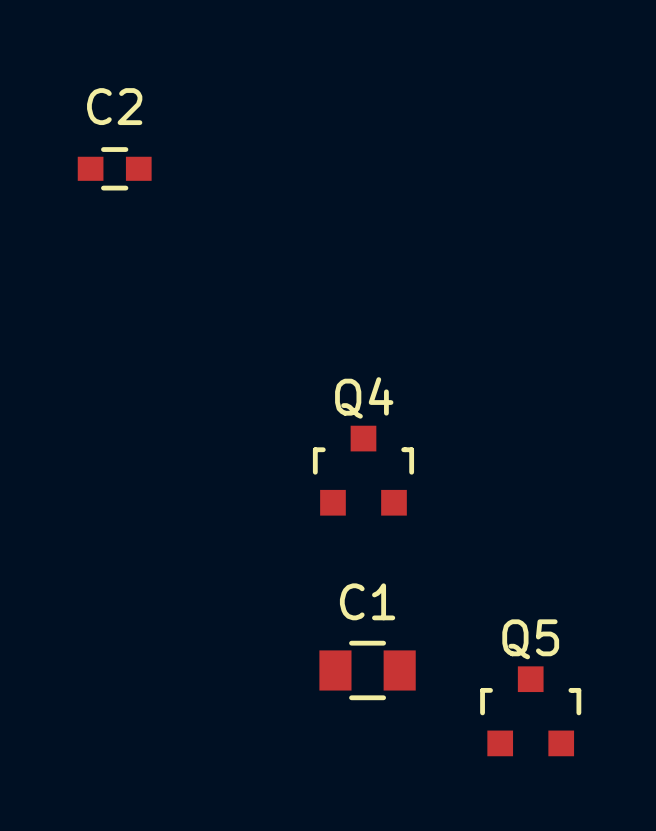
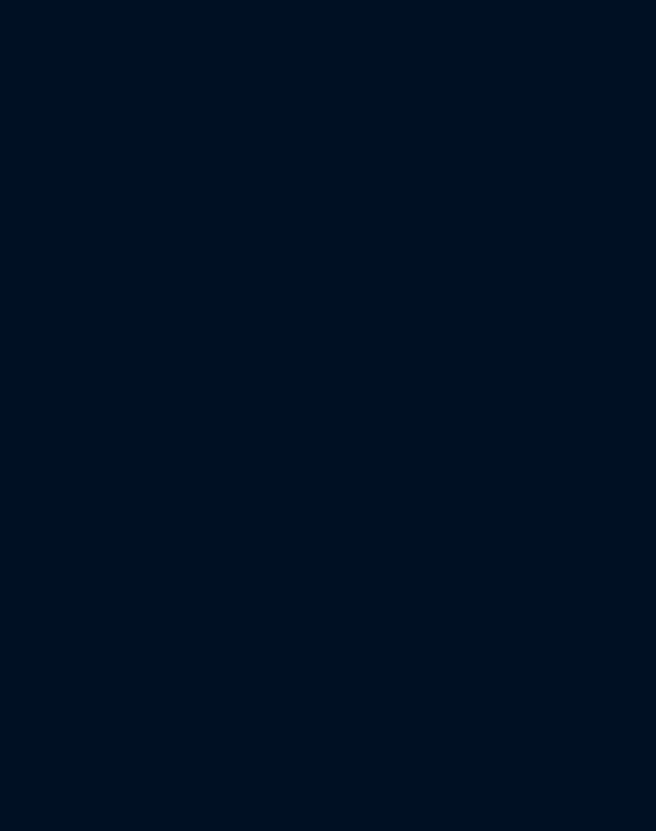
C2: (114, 168) -> none
Q4: (363, 470) -> none
C1: (367, 670) -> none
Q5: (530, 711) -> none

